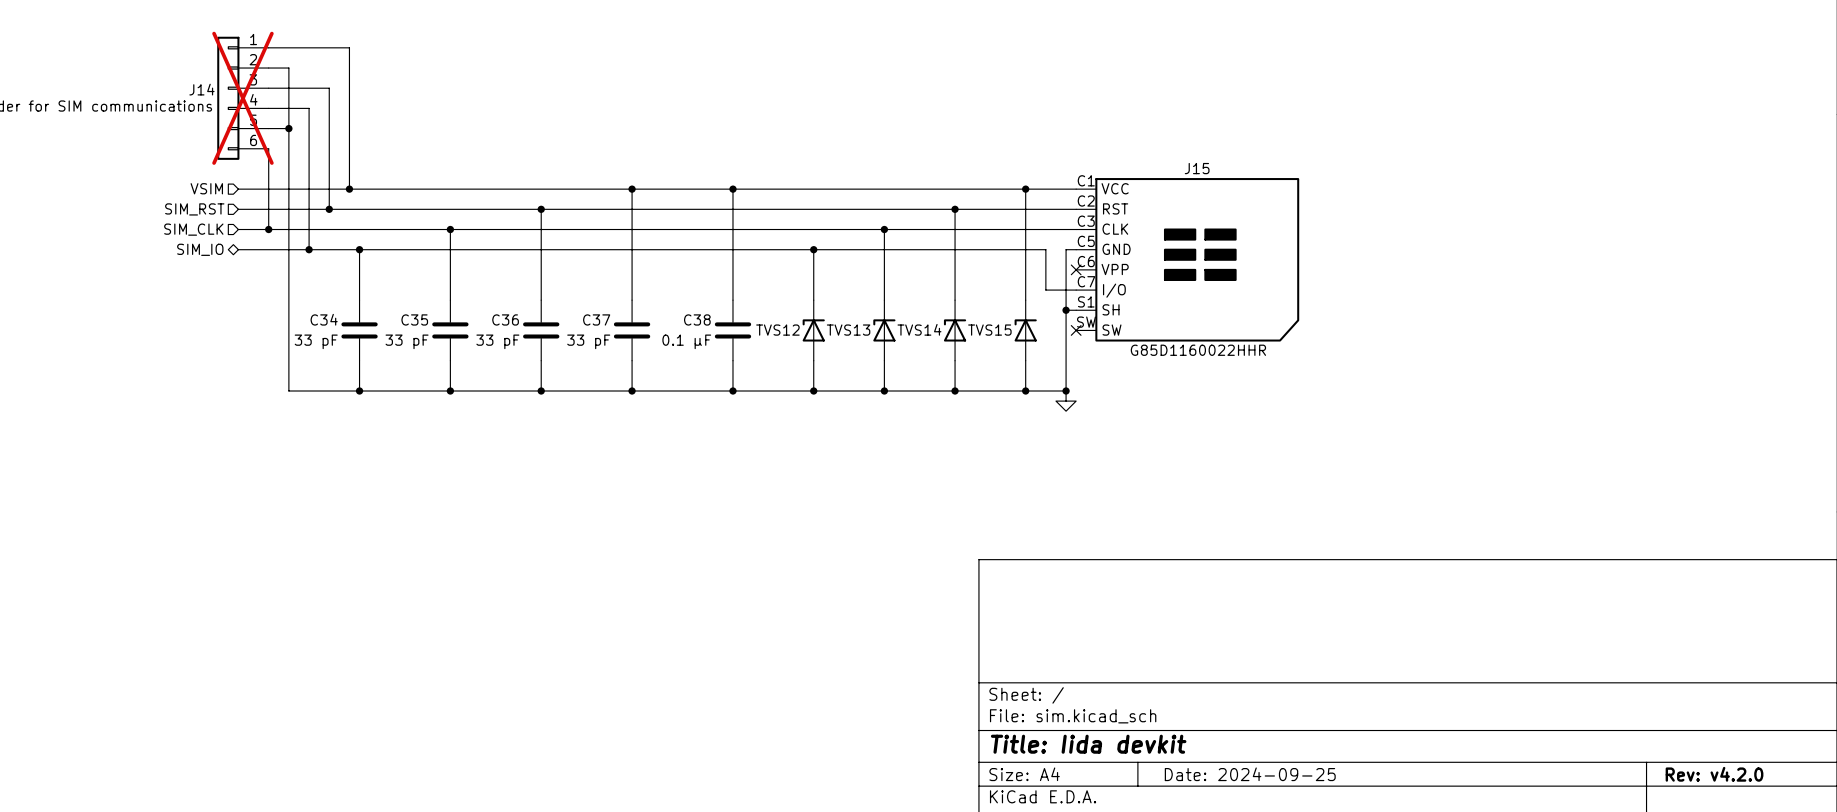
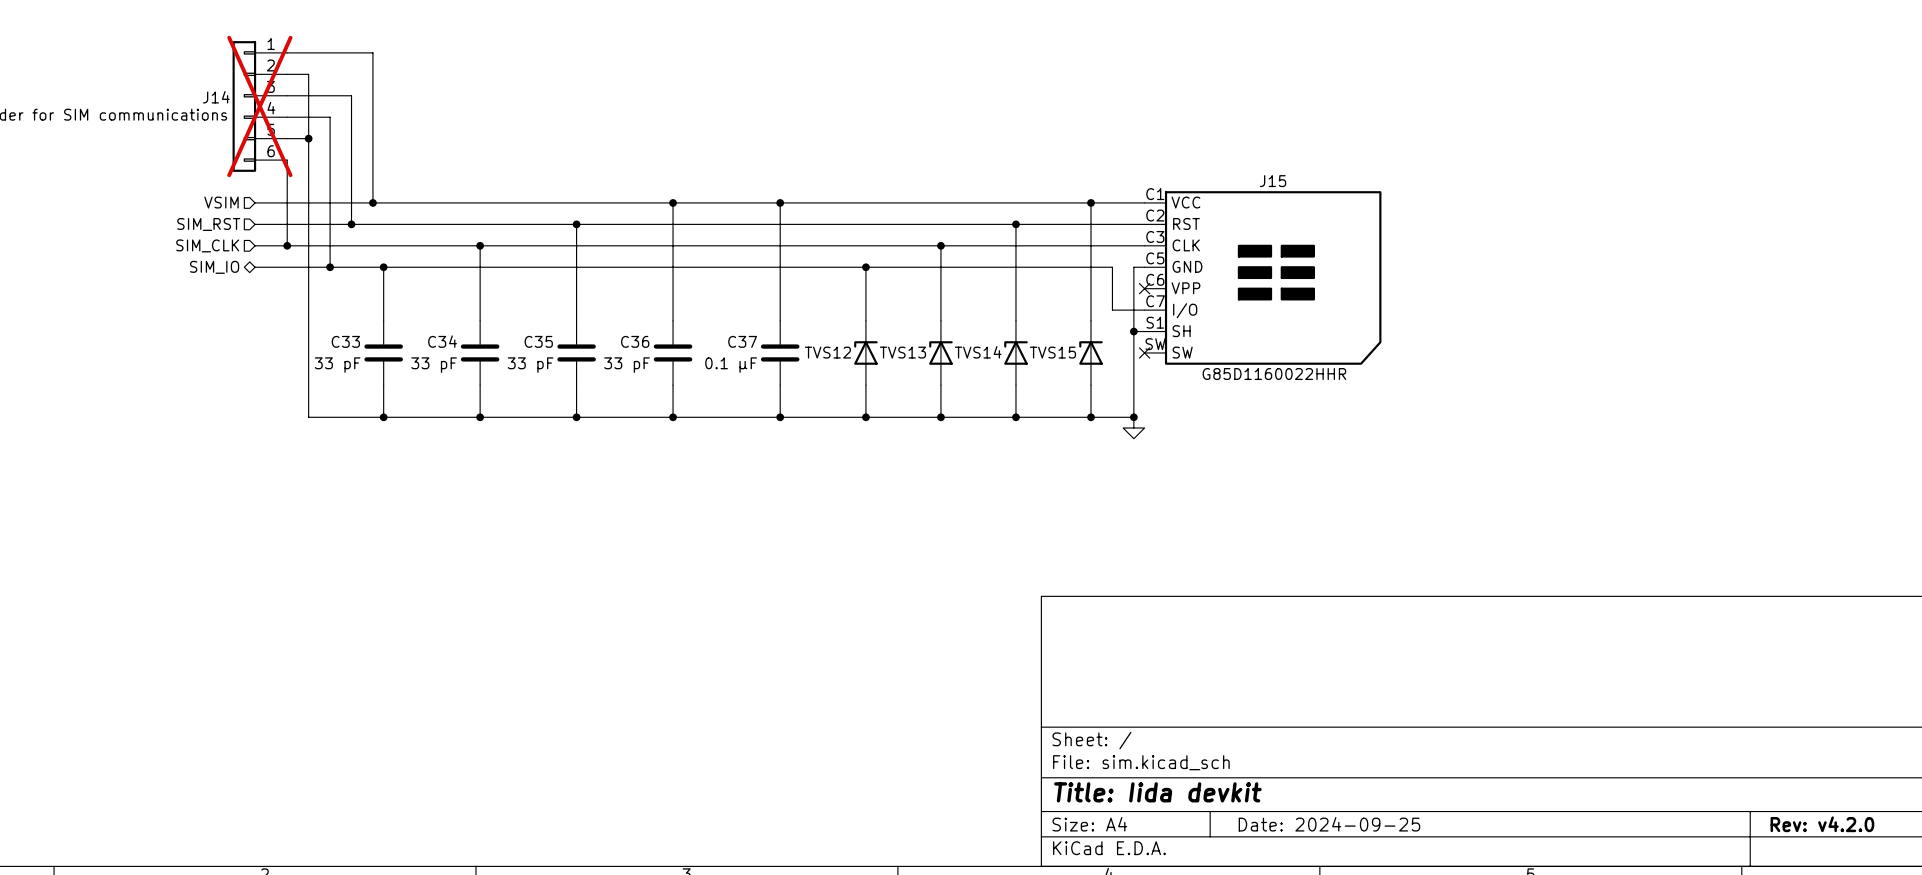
C34 name: C34 (324, 319) -> C33 (345, 341)
C35 name: C35 (414, 319) -> C34 (442, 341)
C36 name: C36 (505, 319) -> C35 (538, 341)
C37 name: C37 (596, 319) -> C36 (635, 341)
C38 name: C38 (697, 319) -> C37 (742, 341)

